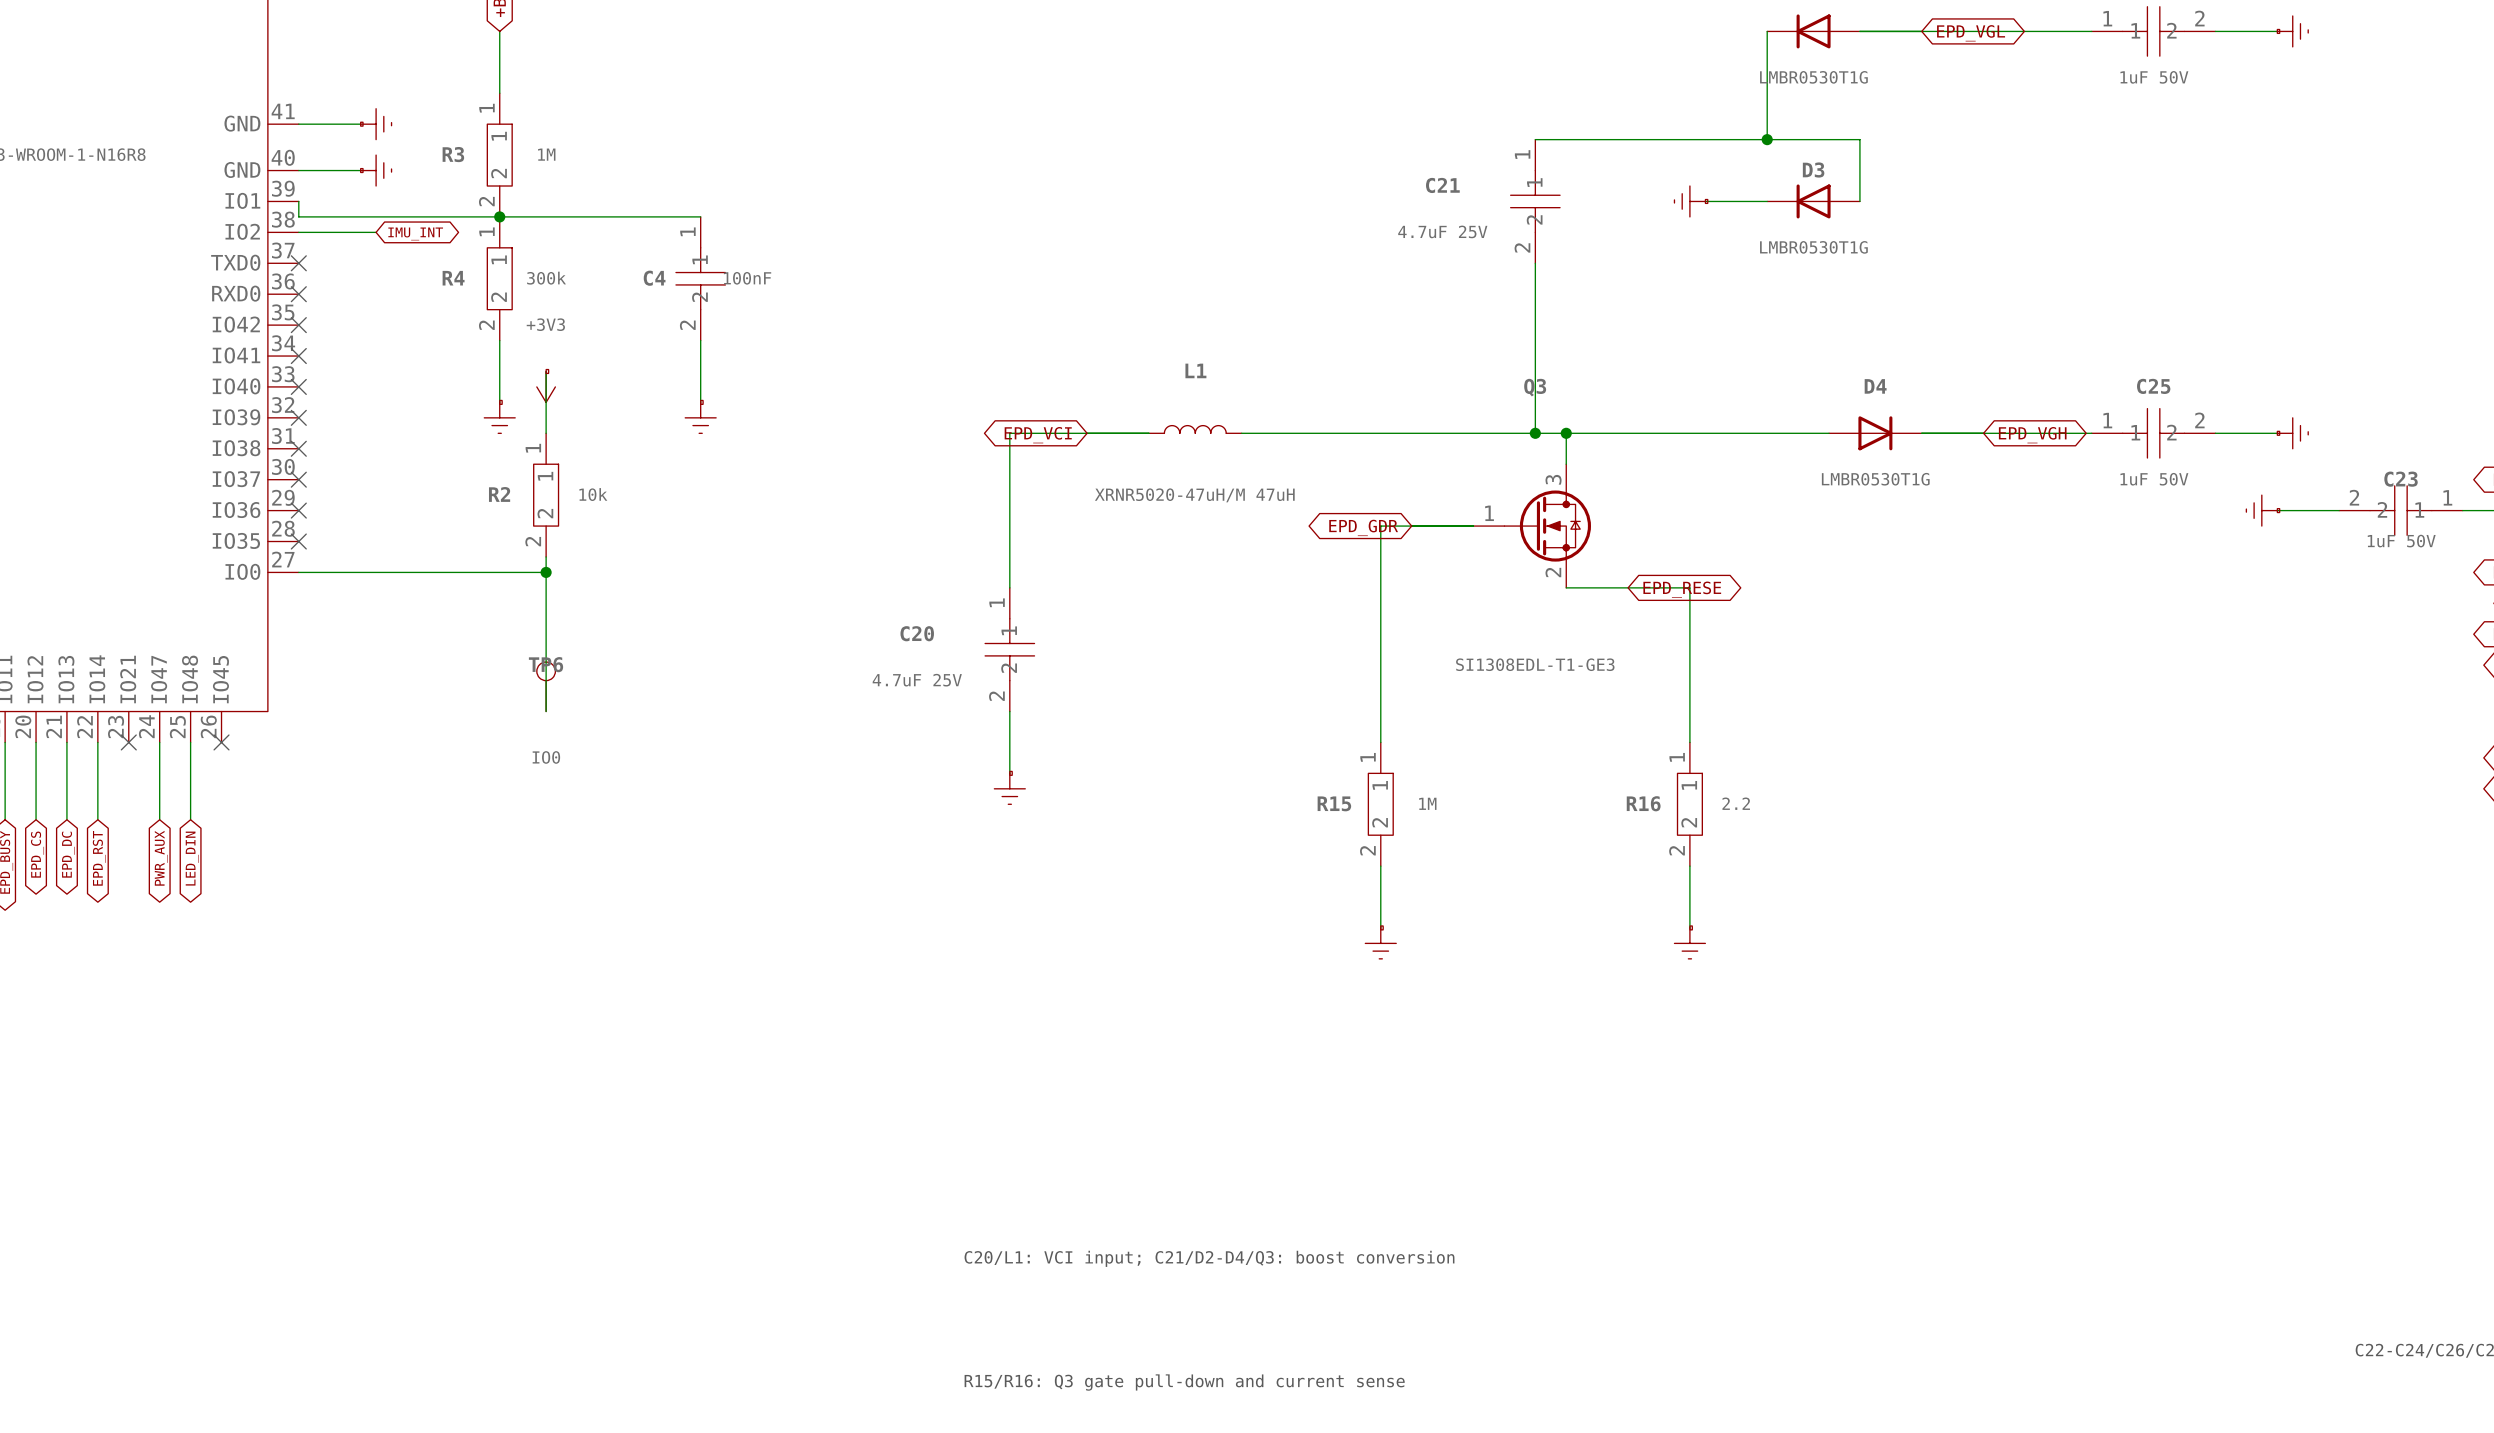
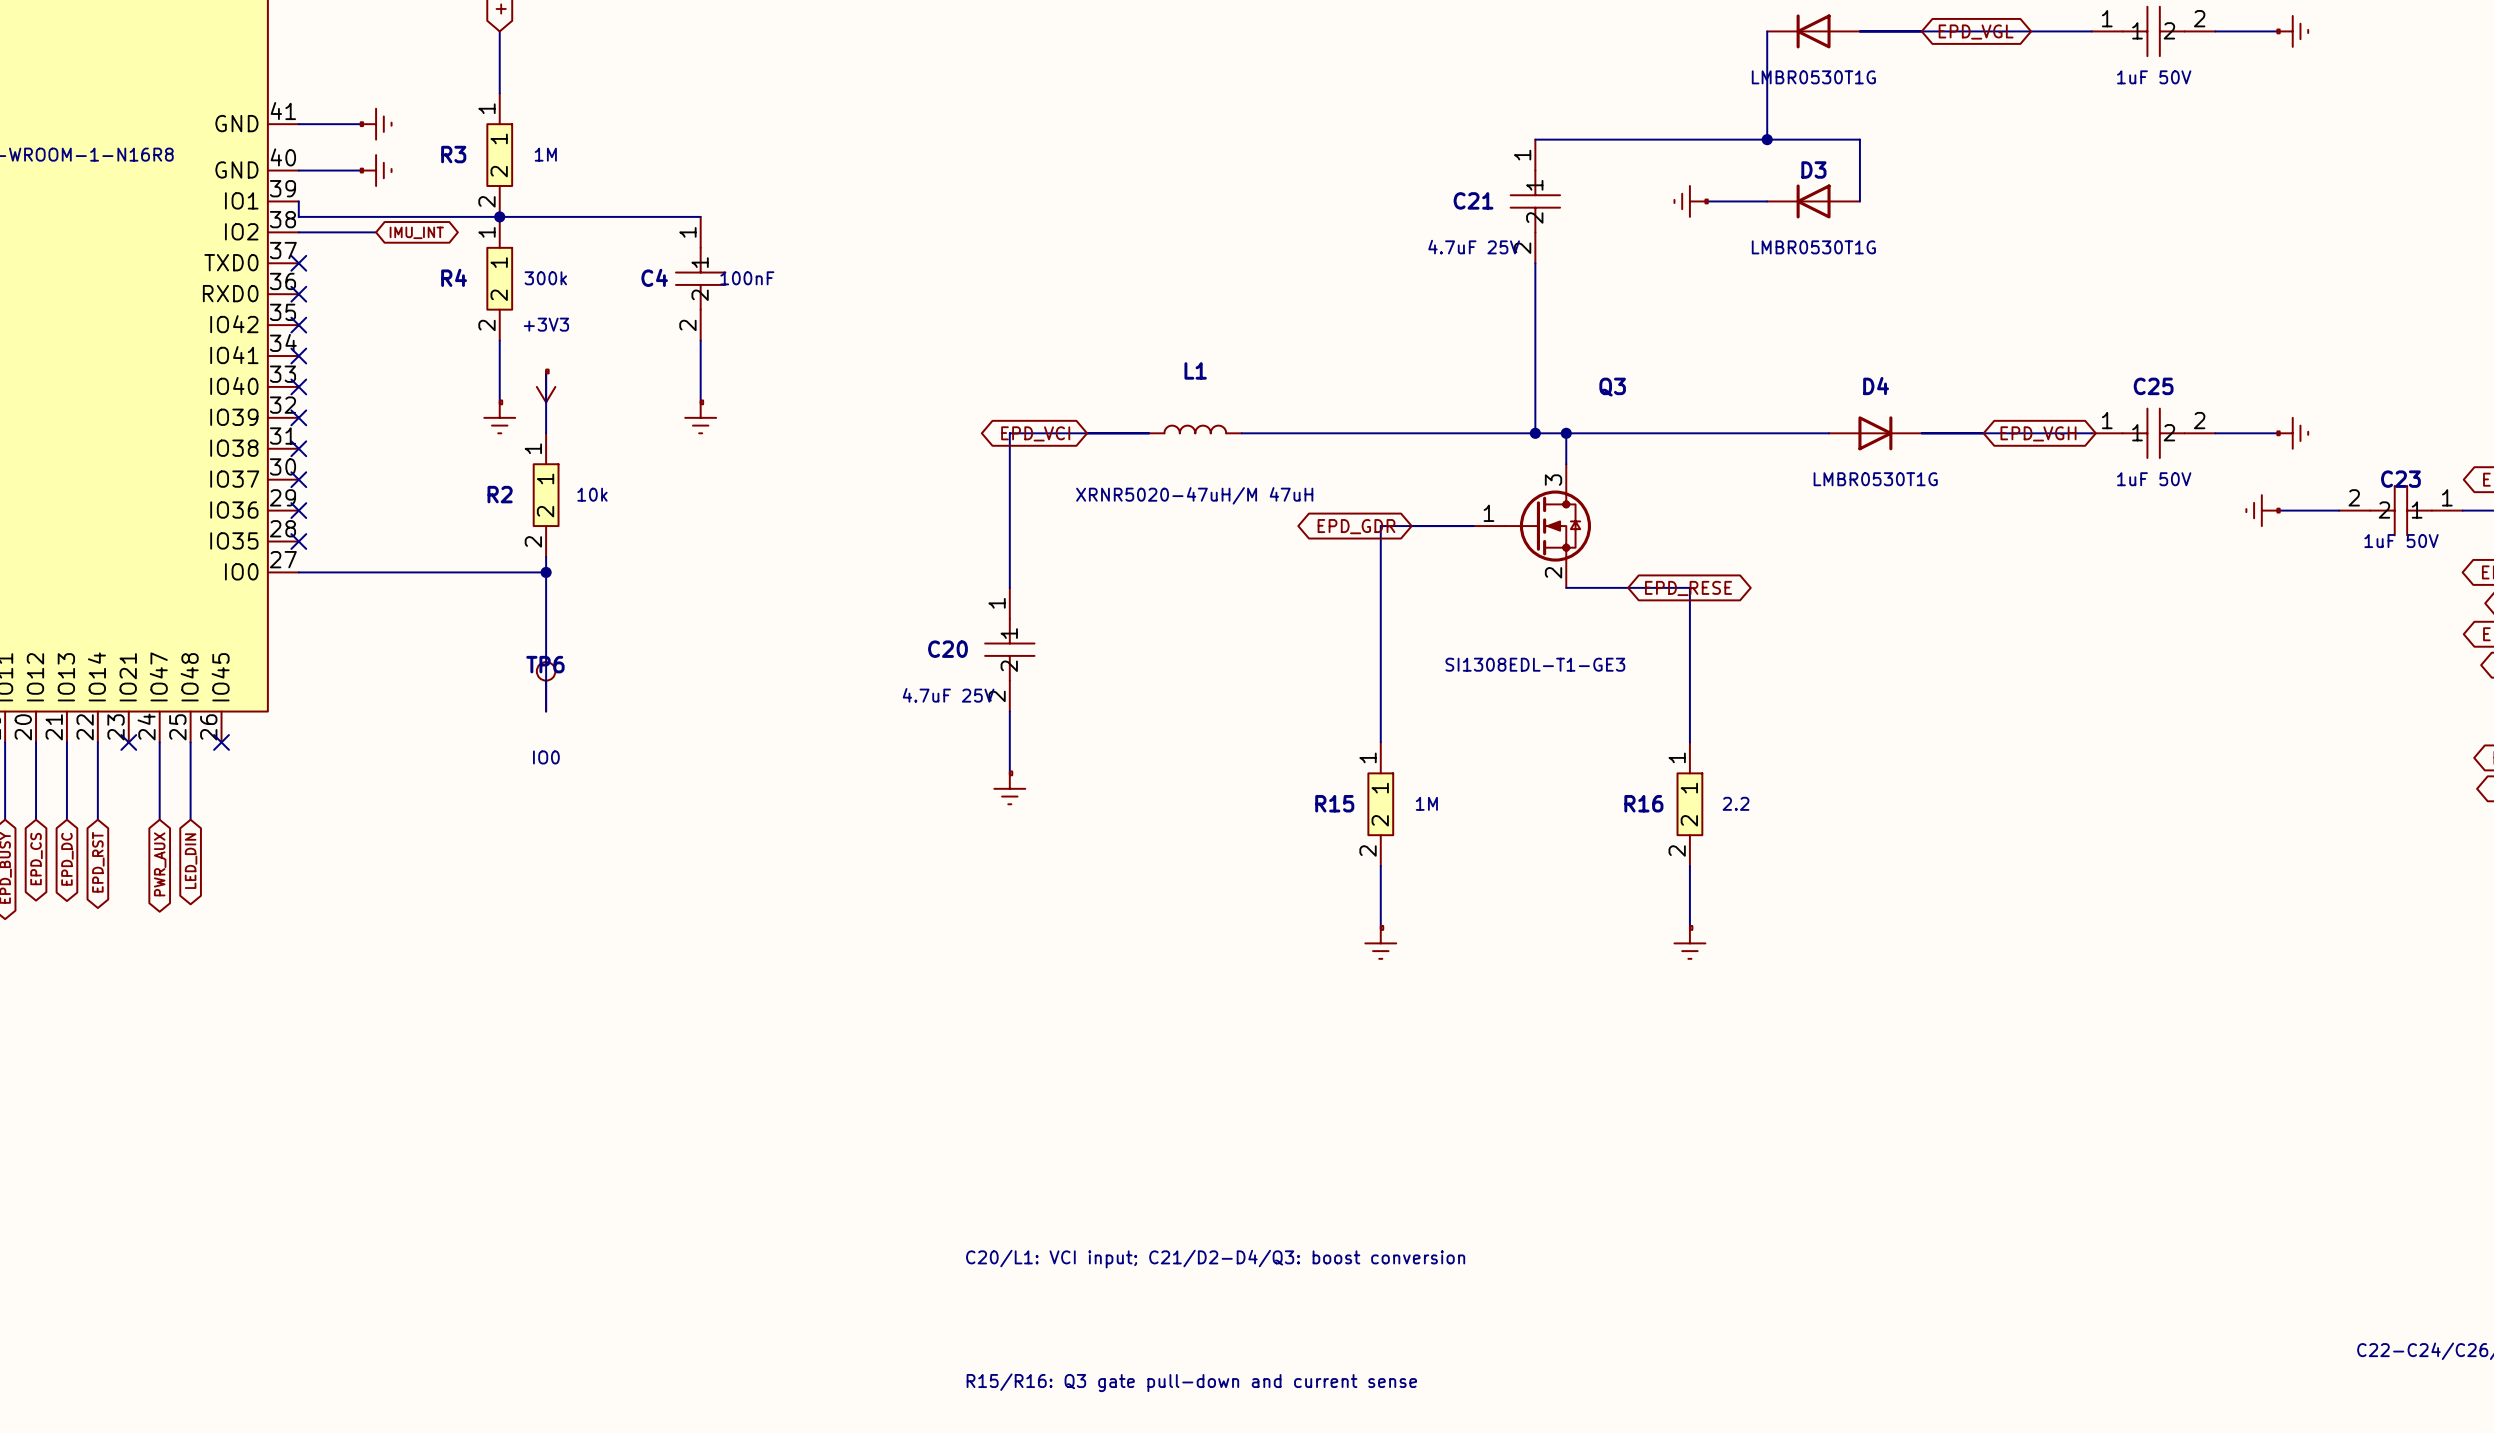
C21 name position: C21 (1442, 185) -> C21 (1473, 200)
C21 value position: 4.7uF 25V (1442, 231) -> 4.7uF 25V (1474, 247)
Q3 name position: Q3 (1535, 387) -> Q3 (1612, 387)
C20 name position: C20 (917, 633) -> C20 (947, 649)
C20 value position: 4.7uF 25V (917, 680) -> 4.7uF 25V (948, 695)

